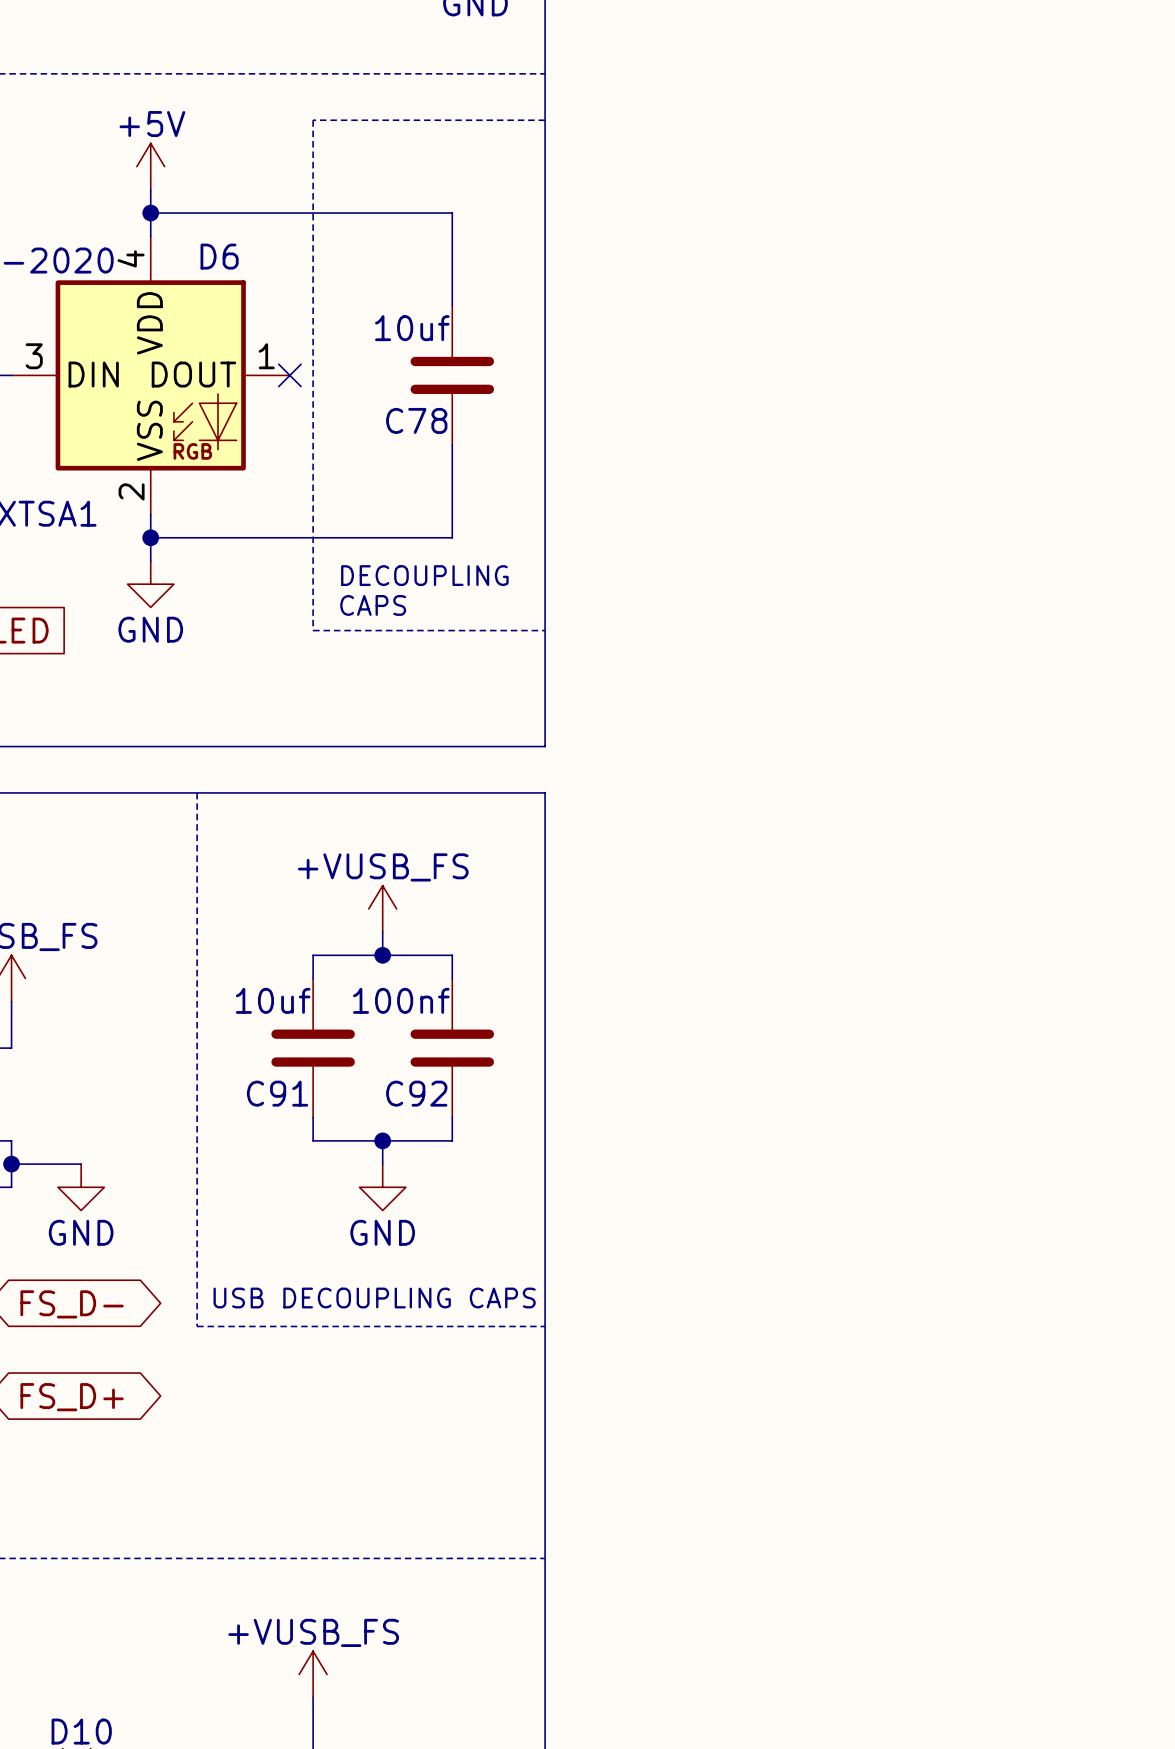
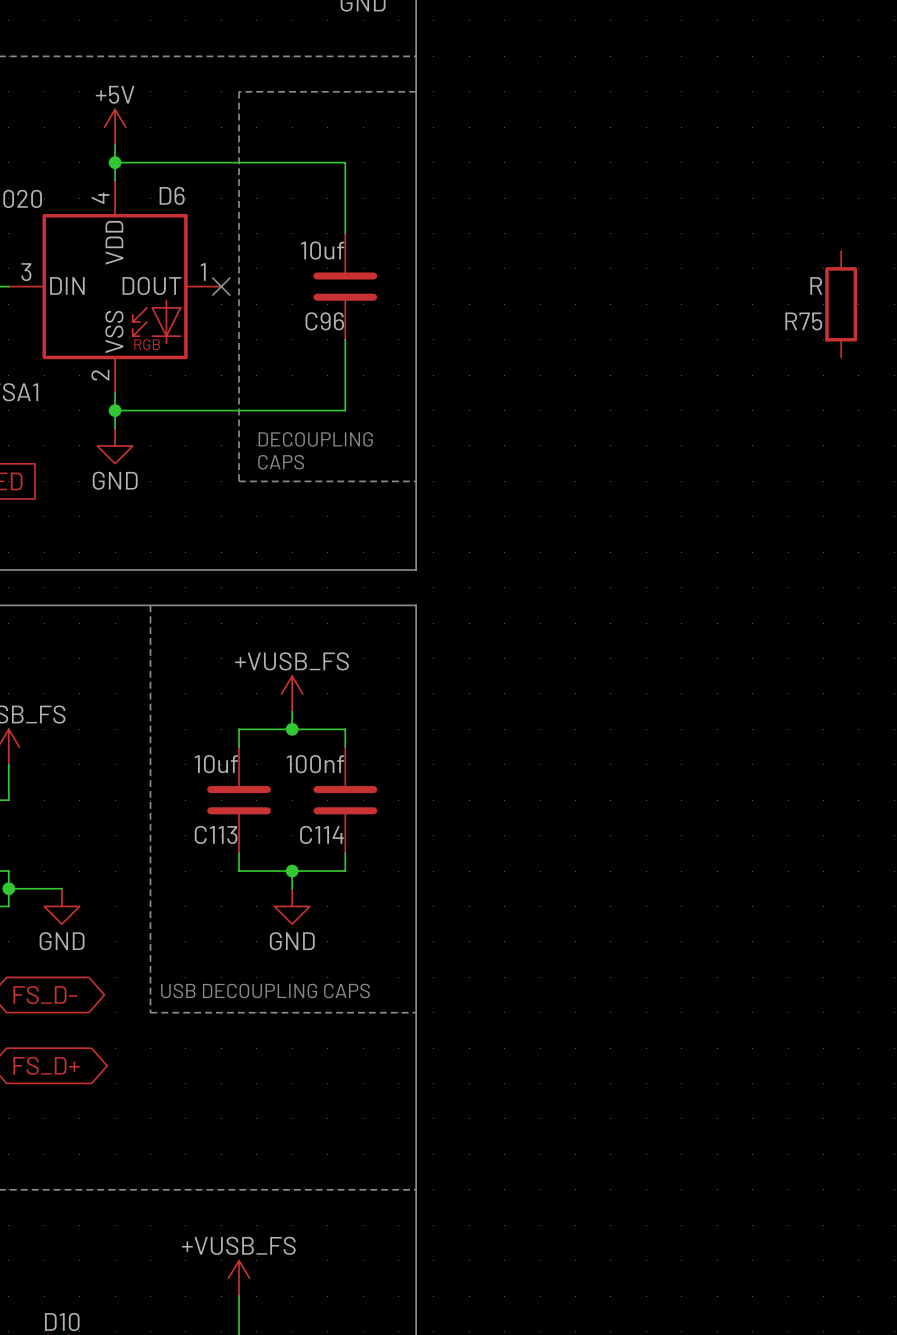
R75: none -> R (841, 304)
C78 name: C78 (416, 420) -> C96 (324, 321)
C91 name: C91 (277, 1093) -> C113 (216, 834)
C92 name: C92 (416, 1093) -> C114 (321, 834)

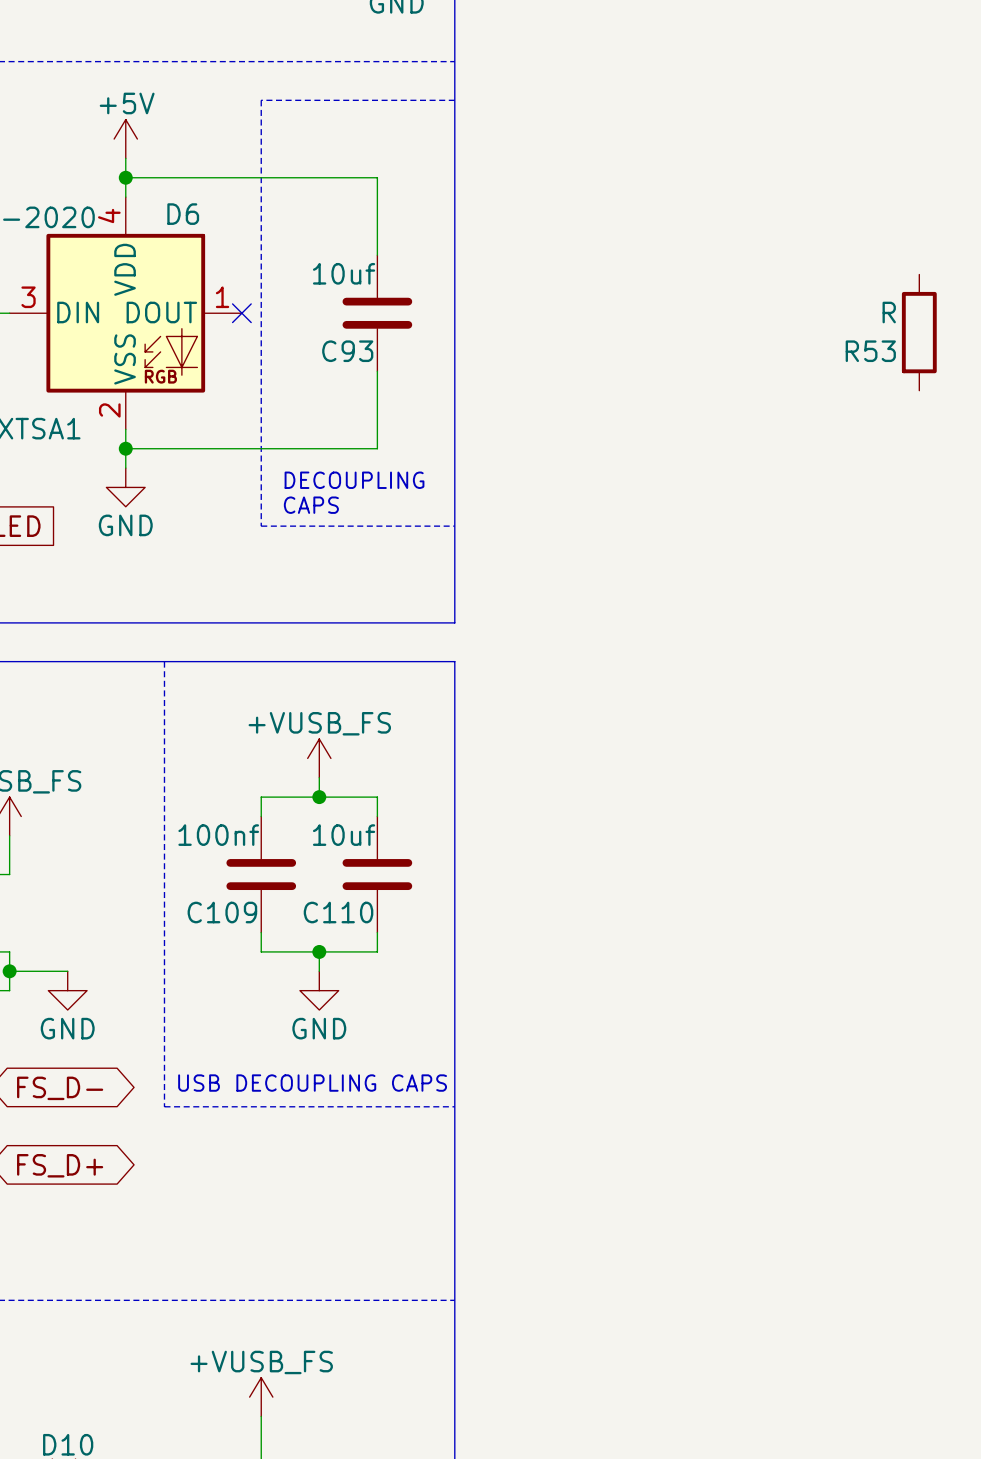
C96 name: C96 (324, 321) -> C93 (347, 351)
R75 name: R75 (803, 321) -> R53 (870, 351)
C113 value: 10uf (216, 764) -> 100nf (218, 835)
C114 value: 100nf (315, 764) -> 10uf (344, 835)
C113 name: C113 (216, 834) -> C109 (222, 912)
C114 name: C114 (321, 834) -> C110 (338, 912)

